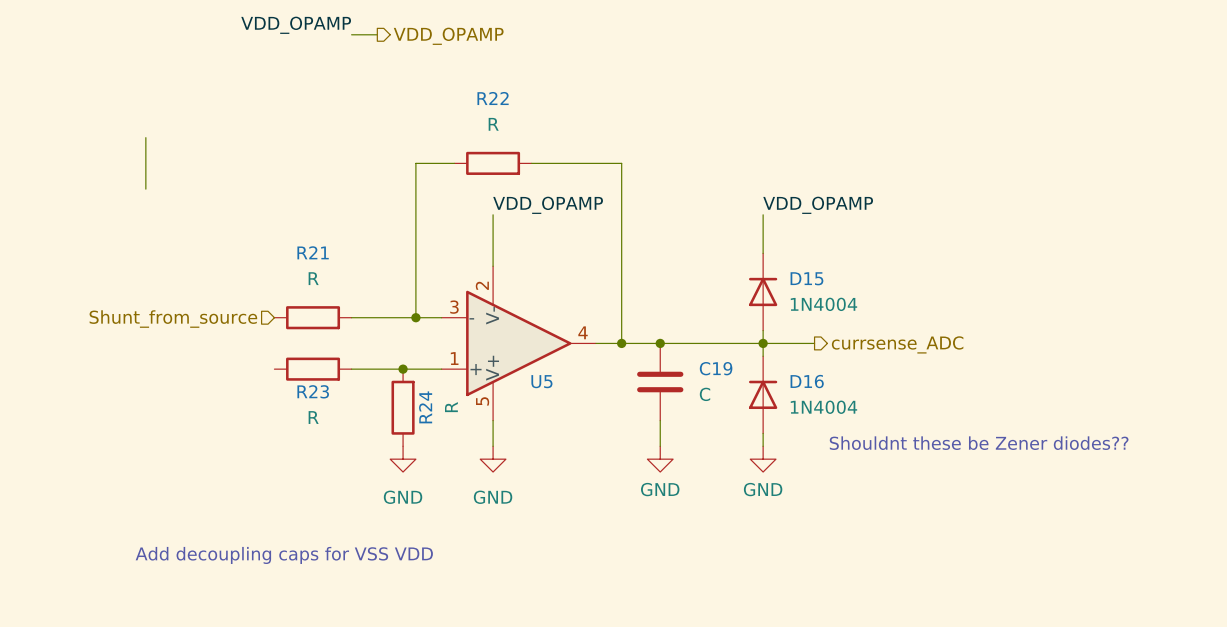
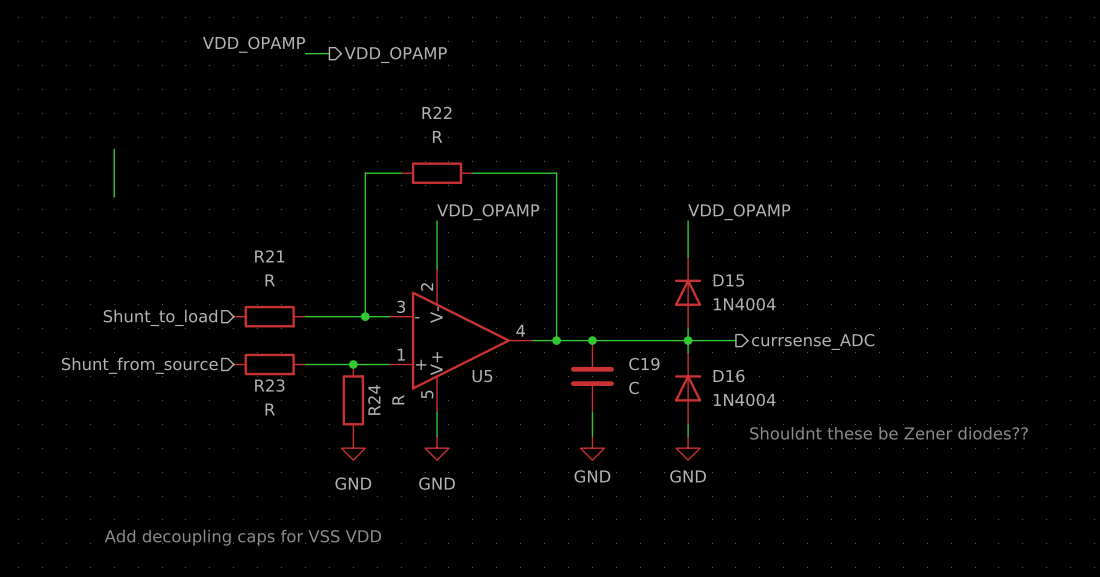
hierarchical label: Shunt_from_source (173, 319) -> Shunt_to_load (160, 317)
hierarchical label: none -> Shunt_from_source (139, 365)

